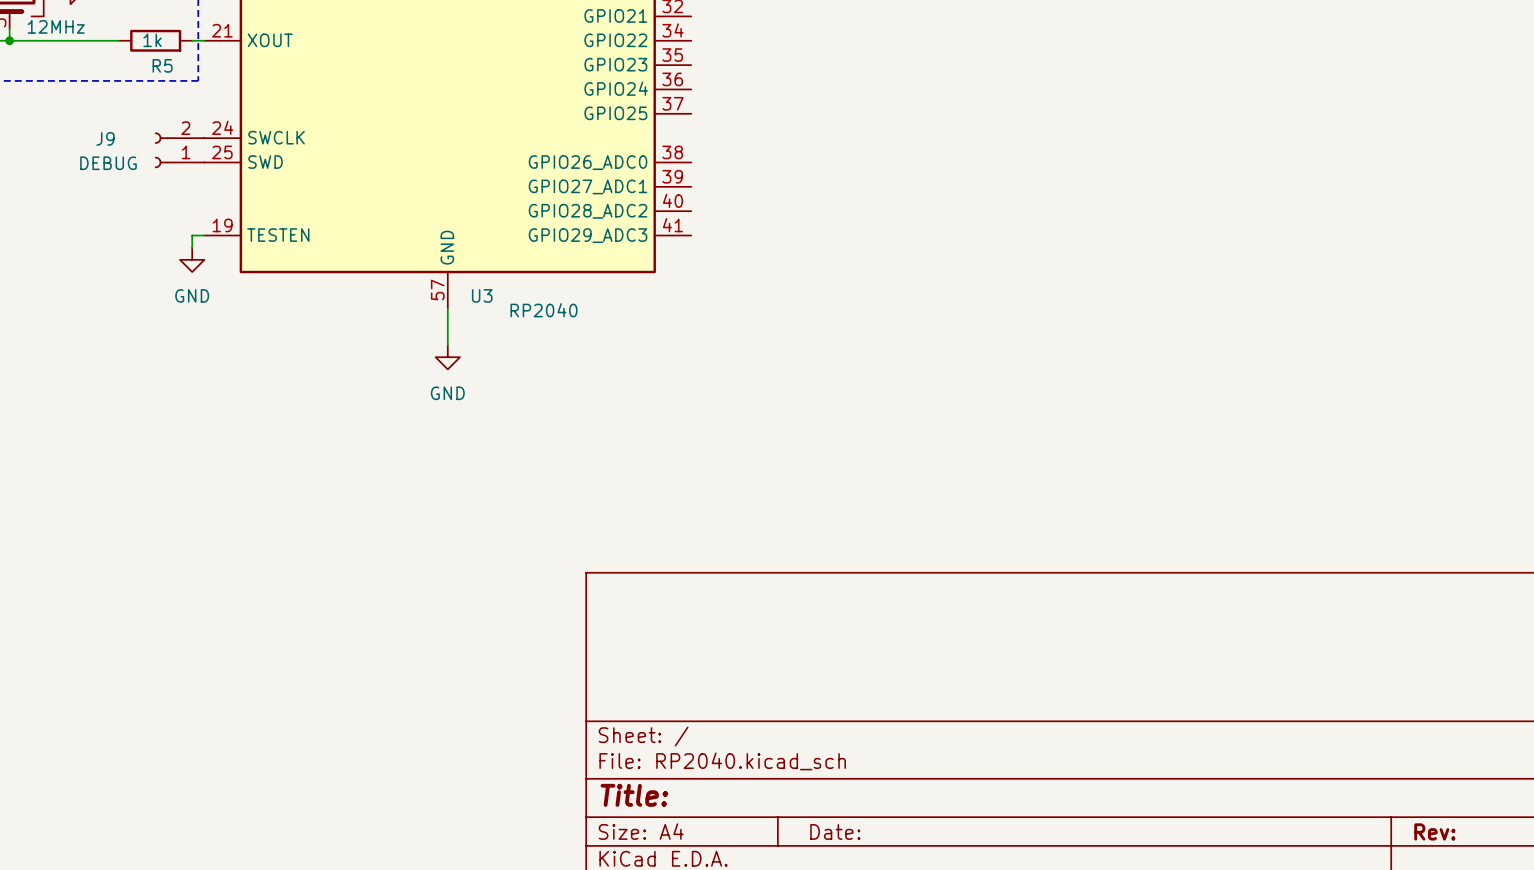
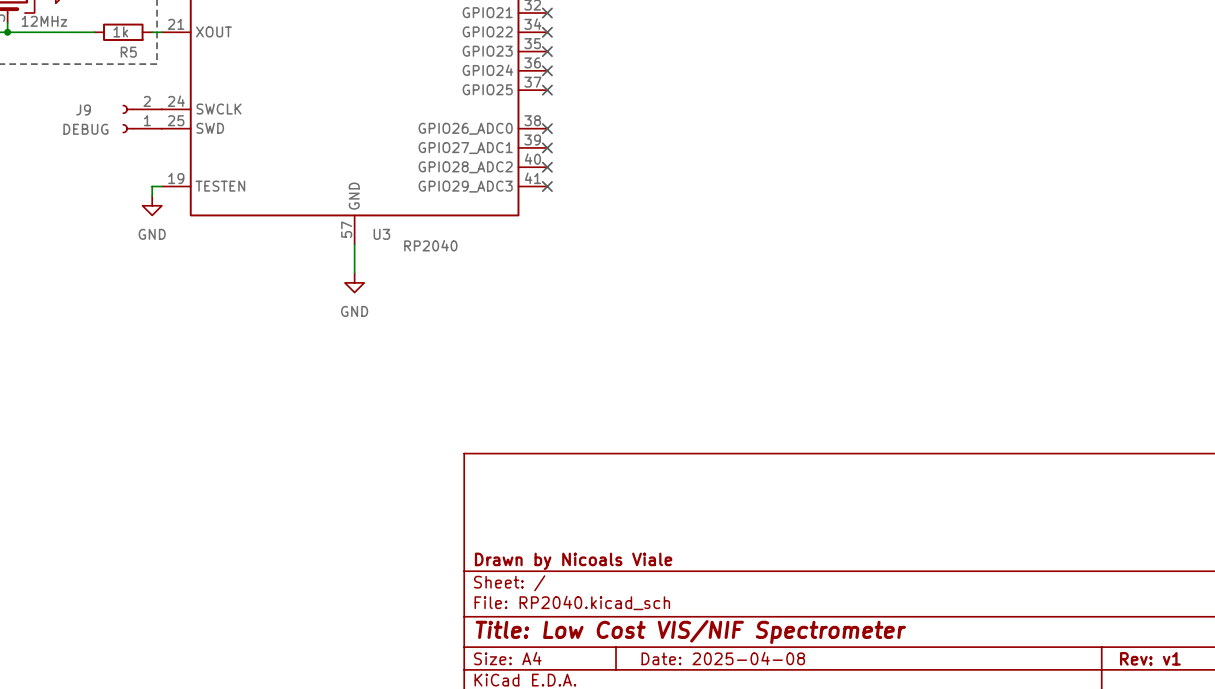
no-connect mark: none -> (547, 13)
no-connect mark: none -> (547, 32)
no-connect mark: none -> (547, 51)
no-connect mark: none -> (547, 70)
no-connect mark: none -> (547, 90)
no-connect mark: none -> (547, 128)
no-connect mark: none -> (547, 147)
no-connect mark: none -> (547, 167)
no-connect mark: none -> (547, 186)
title block: none -> Drawn by Nicoals Viale (573, 561)
title block: Title: (634, 795) -> Title: Low Cost VIS/NIF Spectrometer (690, 632)
title block: Date: (835, 831) -> Date: 2025-04-08 (723, 658)
title block: Rev: (1434, 831) -> Rev: v1 (1150, 658)

